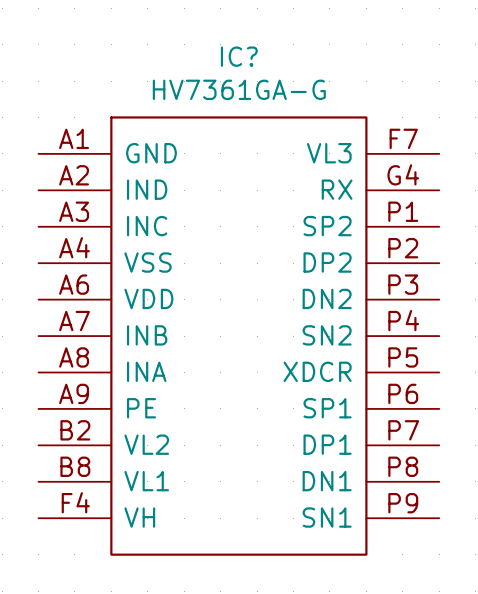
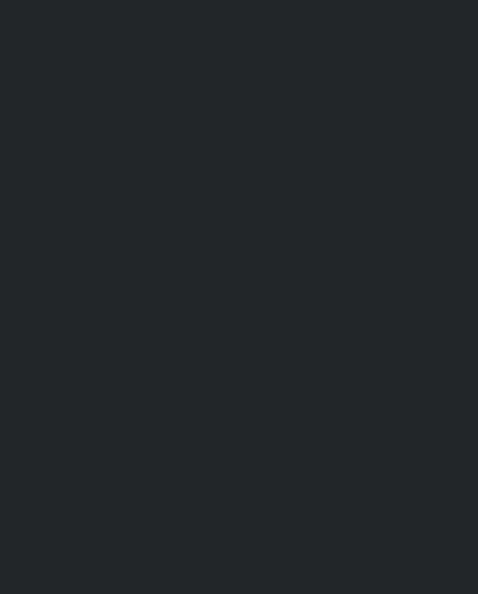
IC?: HV7361GA-G (238, 336) -> none

